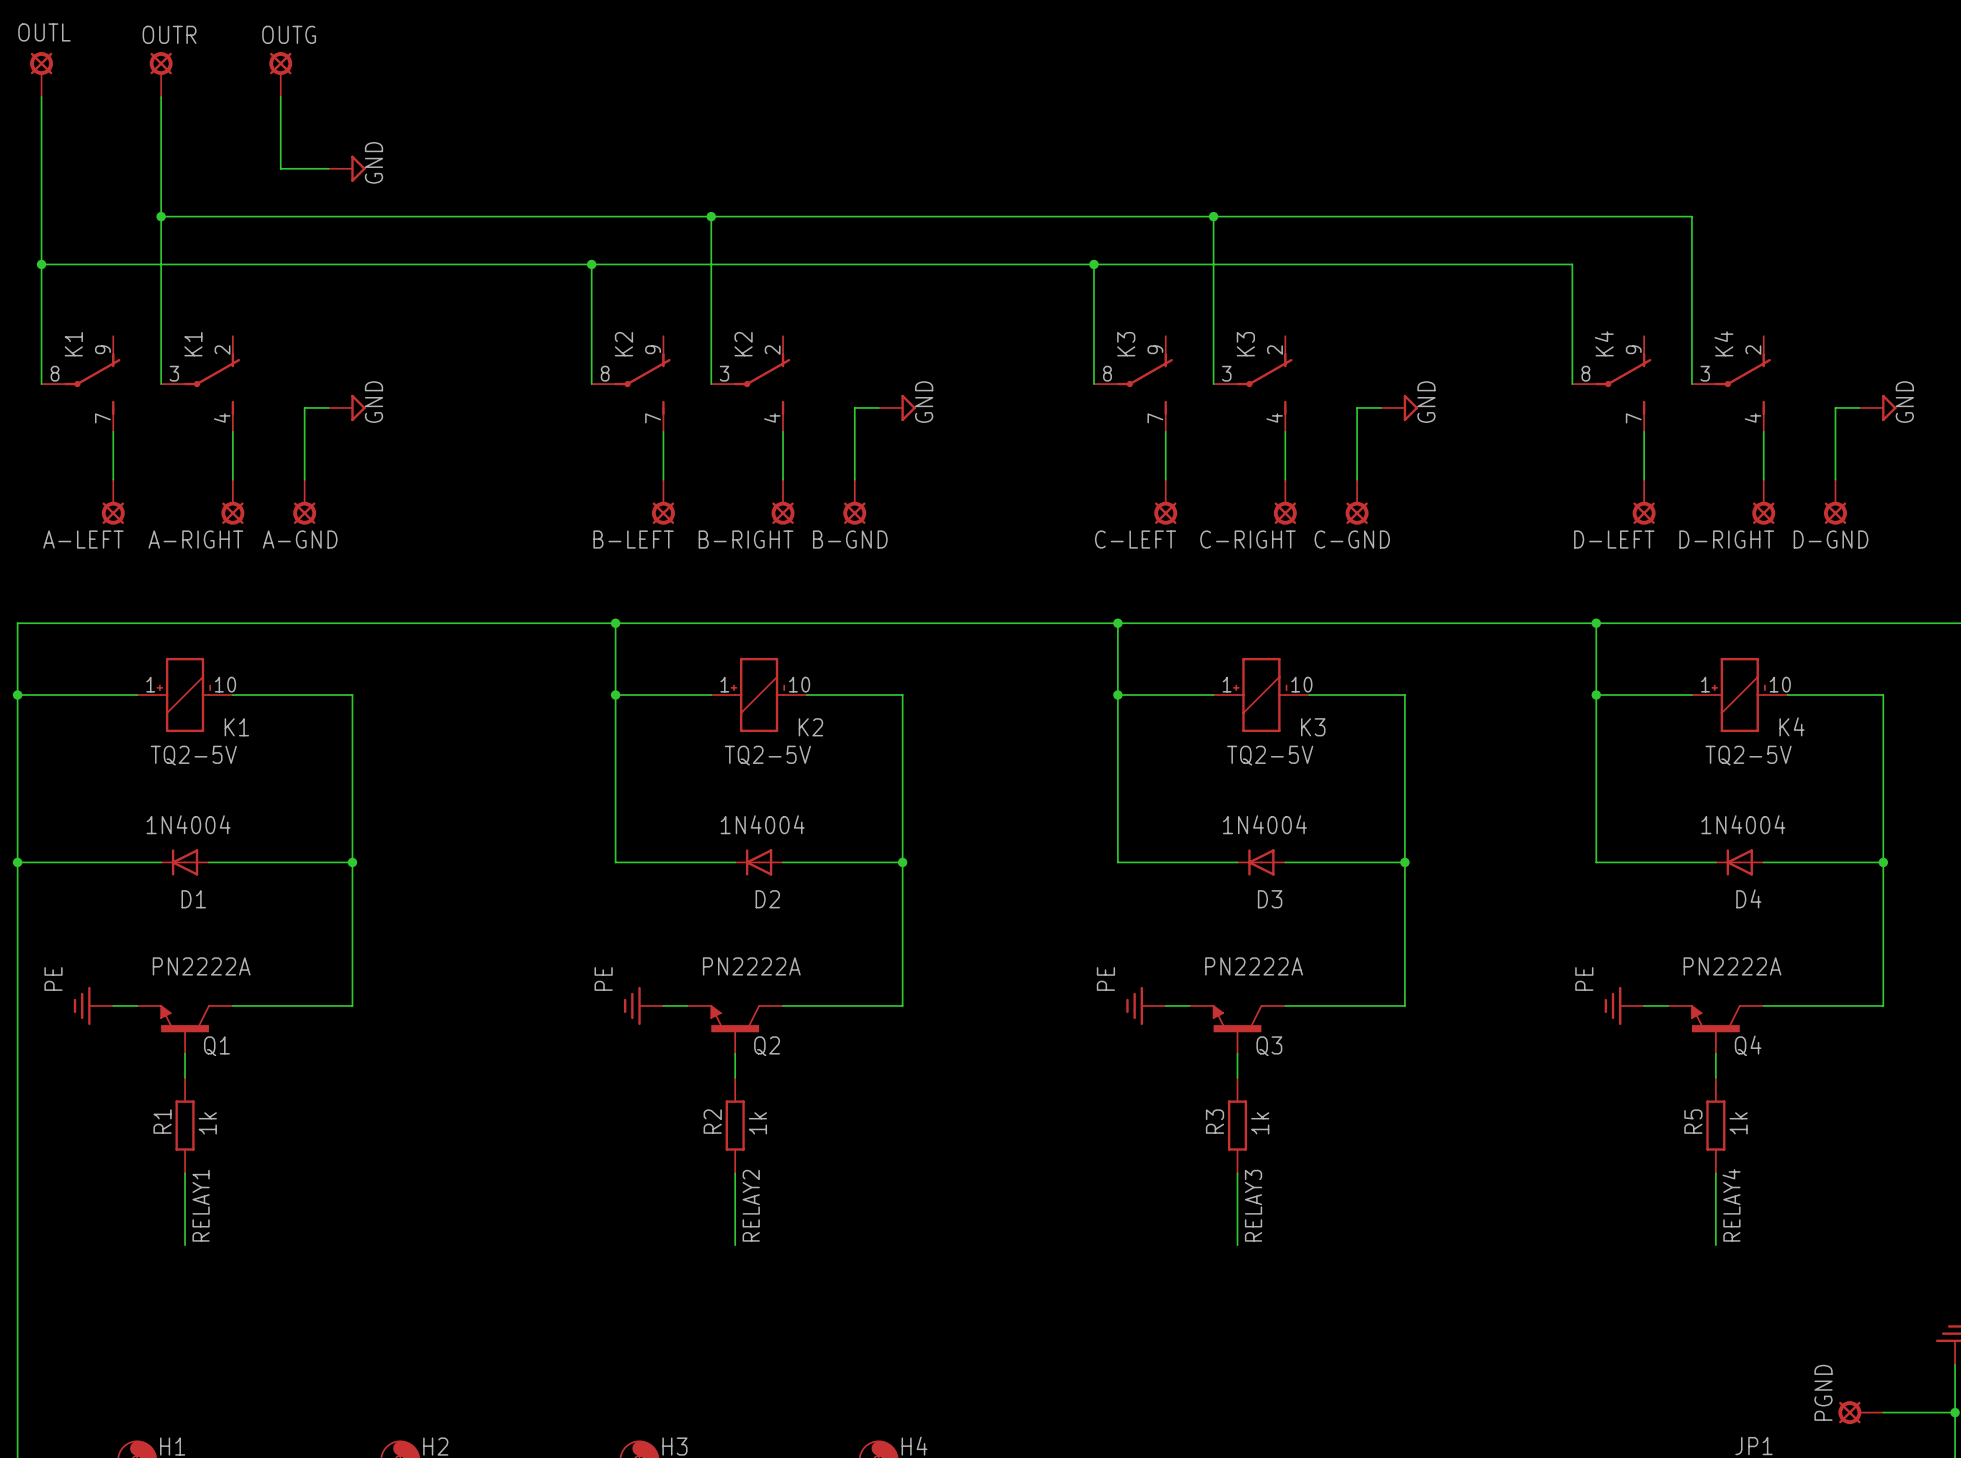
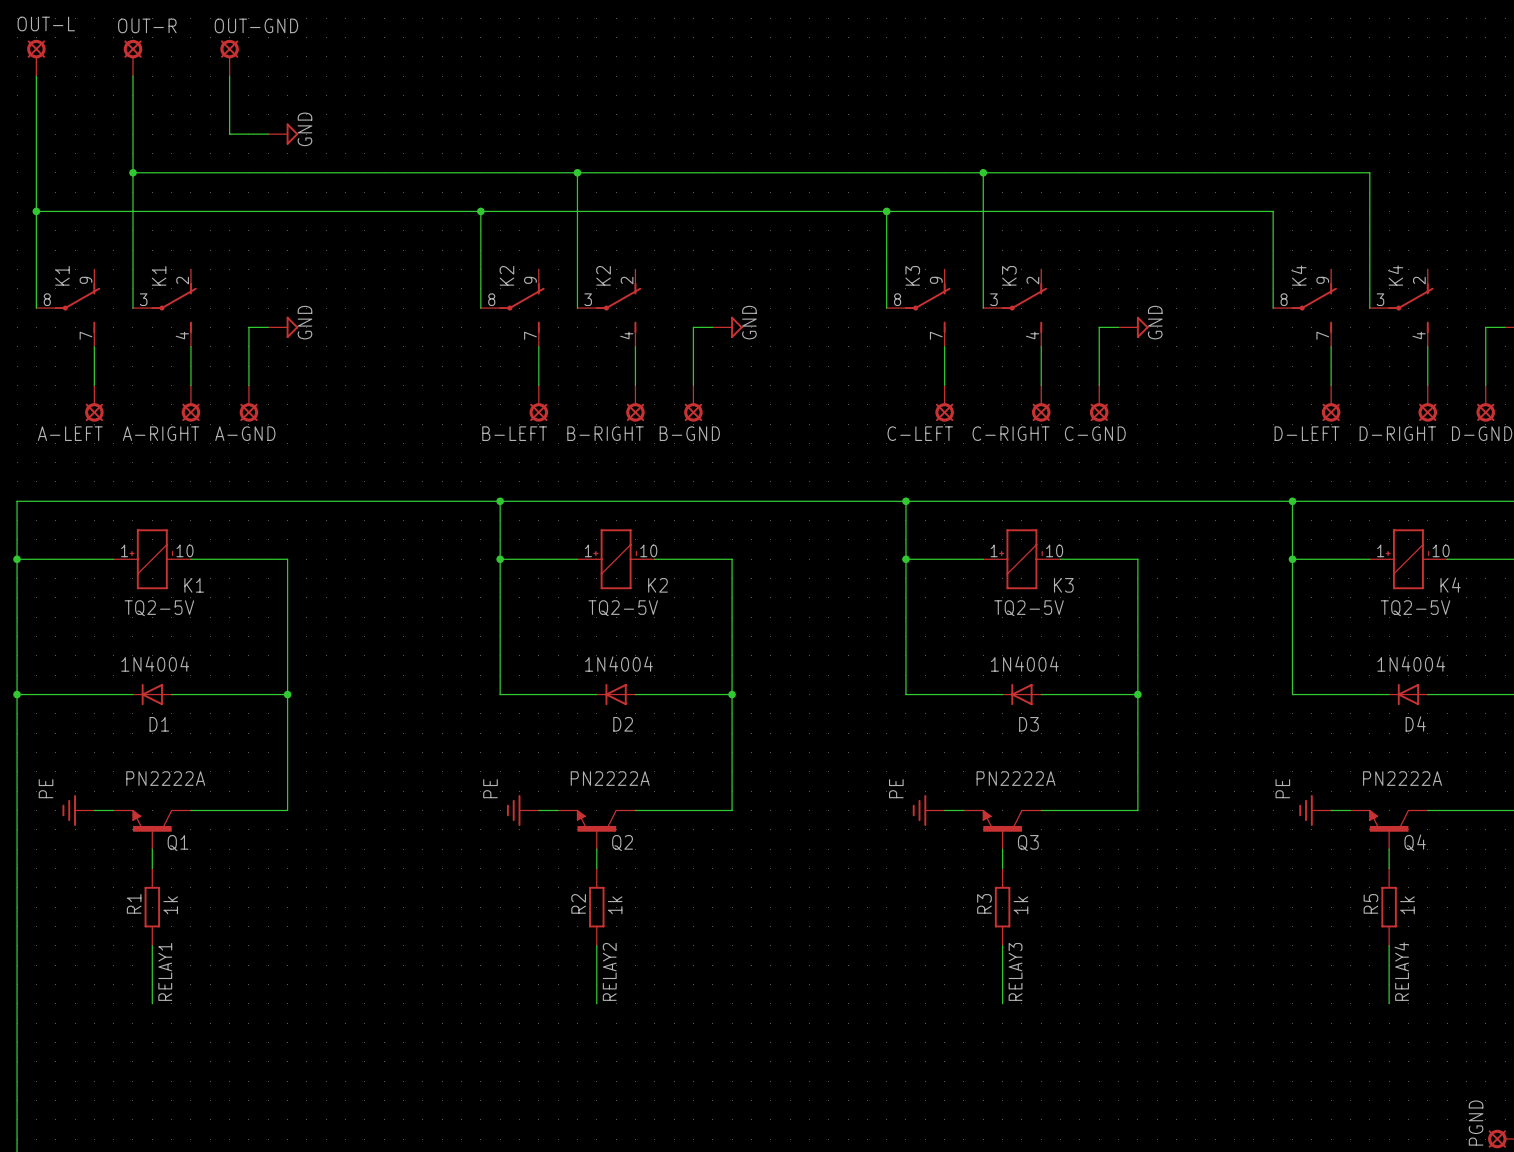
OUTL name: OUTL (44, 32) -> OUT-L (46, 23)
OUTR name: OUTR (169, 34) -> OUT-R (147, 25)
OUTG name: OUTG (289, 34) -> OUT-GND (256, 25)

